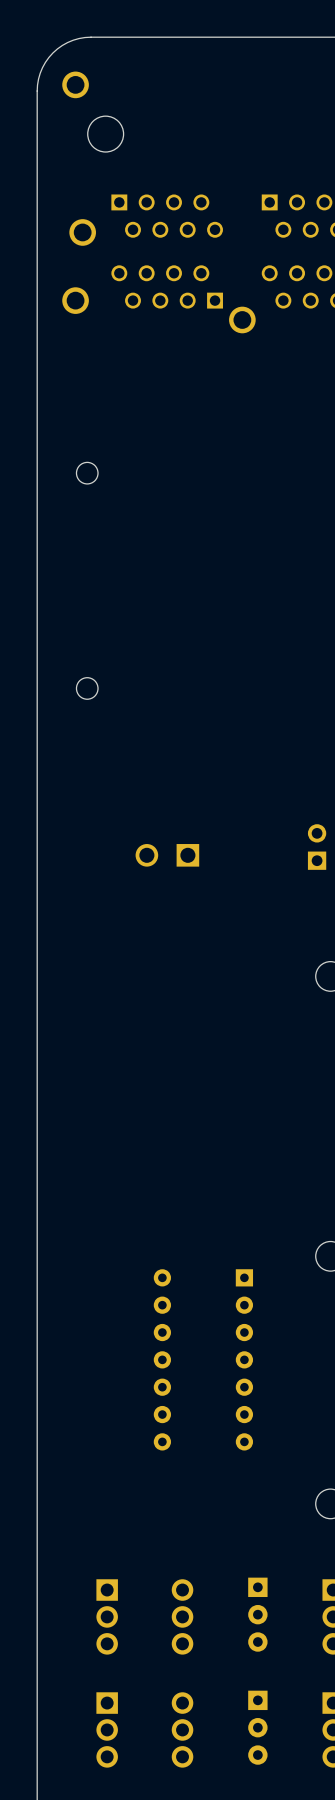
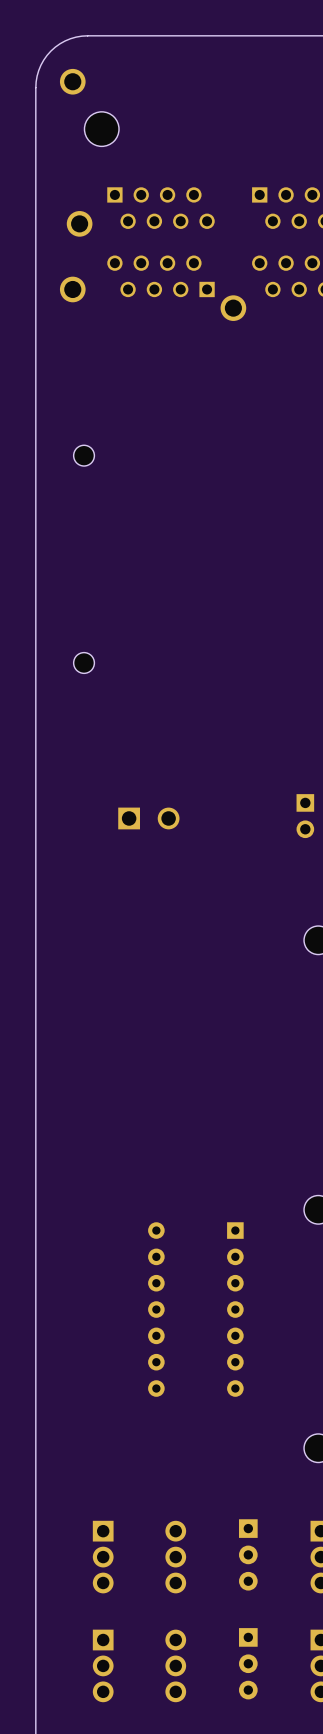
part rotation: 0° (317, 847) -> 180° (305, 816)
part rotation: 0° (167, 855) -> 180° (148, 818)

